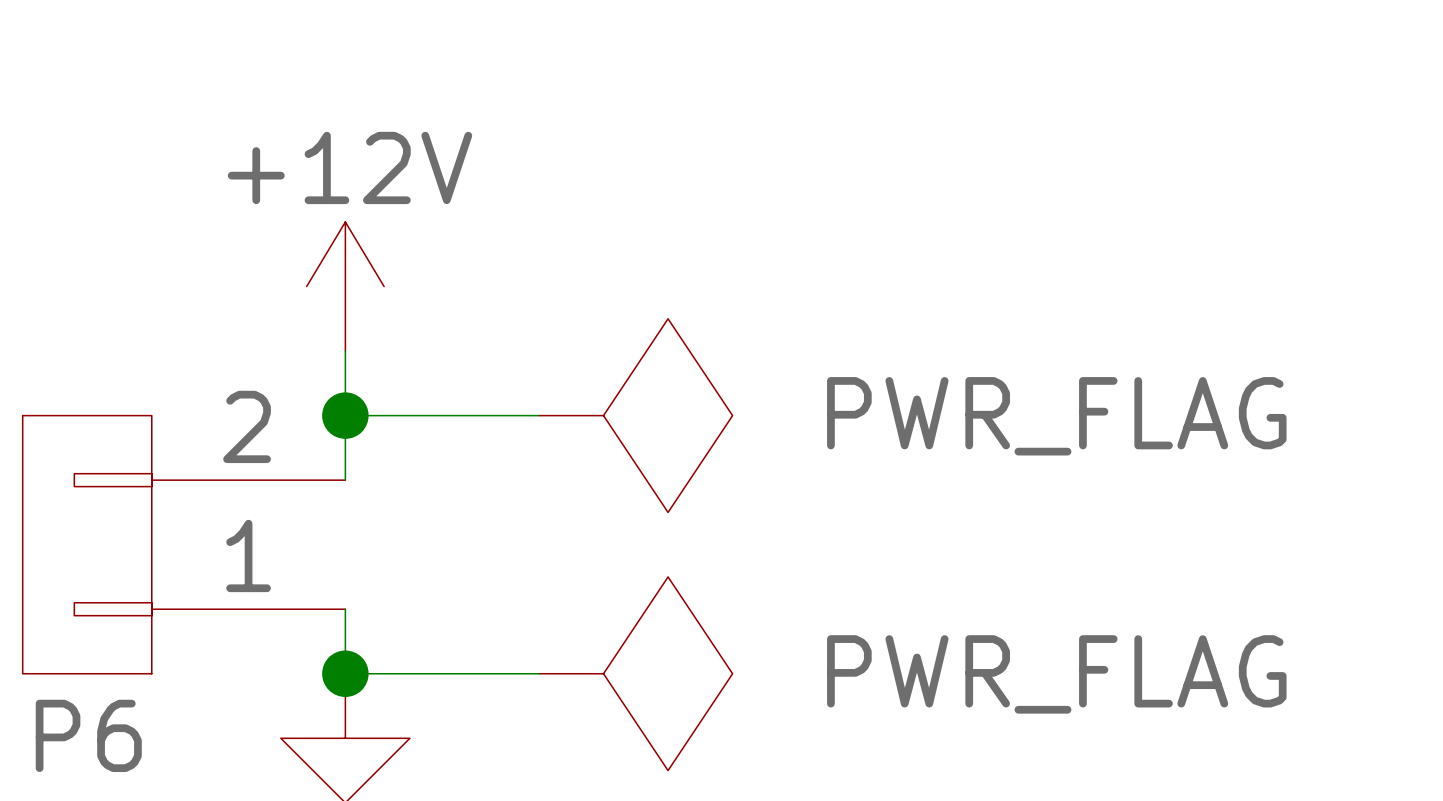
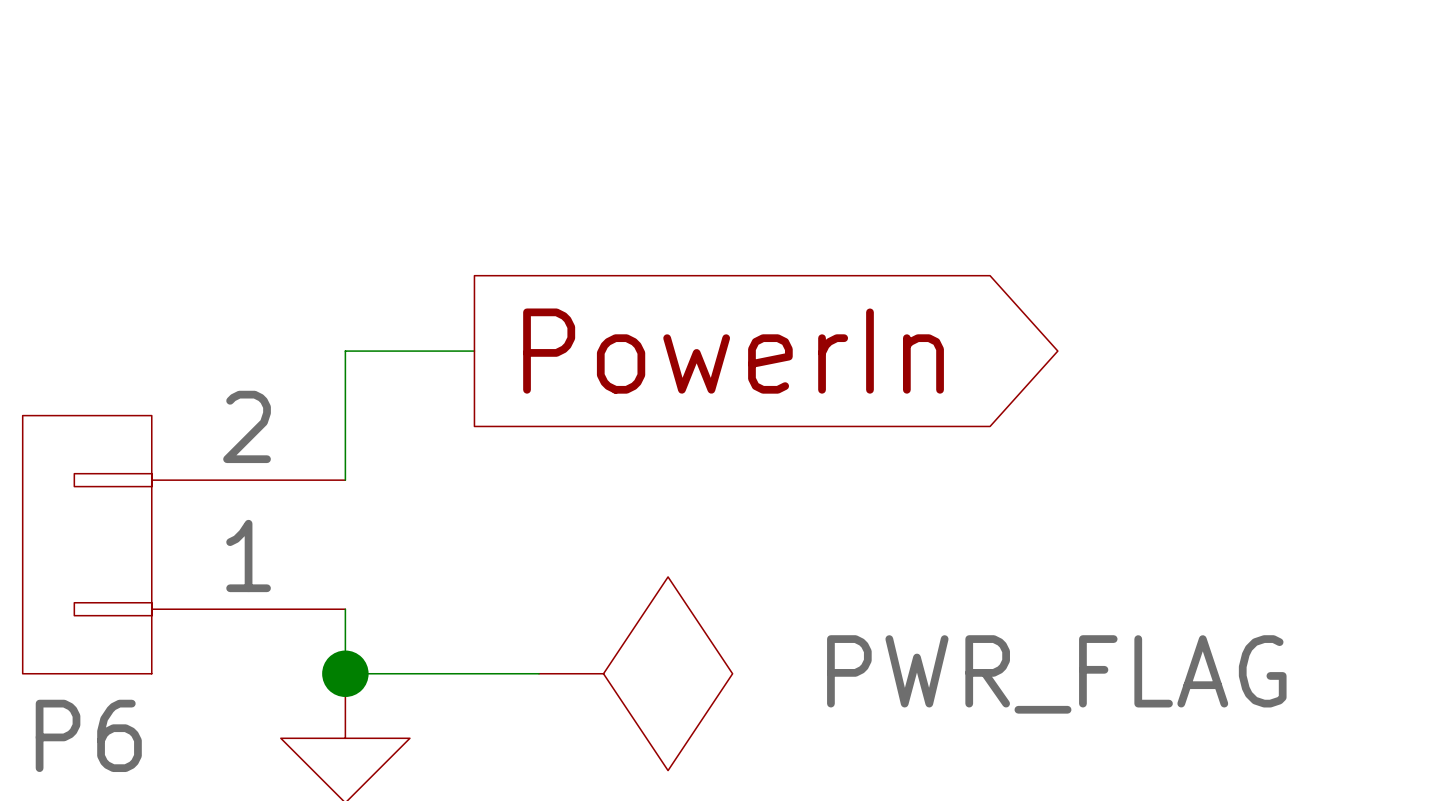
power symbol: +12V (345, 286) -> none
wire: none -> (345, 351) (474, 351)
global label: none -> PowerIn (733, 351)
wire: (345, 415) (538, 415) -> none
junction: (345, 415) -> none
power symbol: PWR_FLAG (635, 415) -> none

